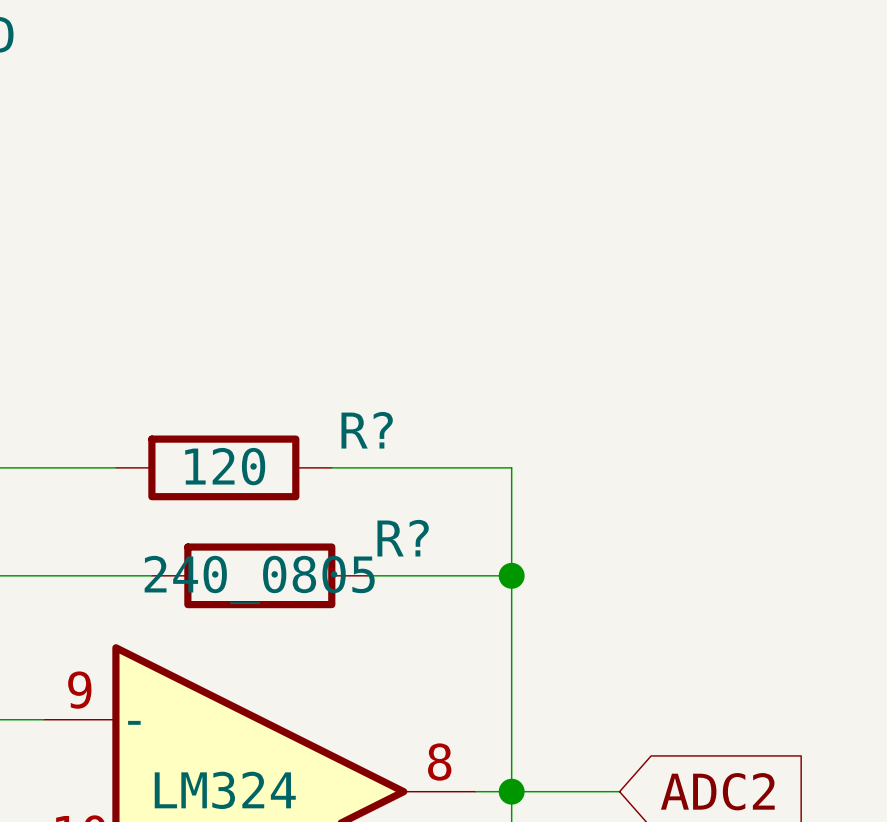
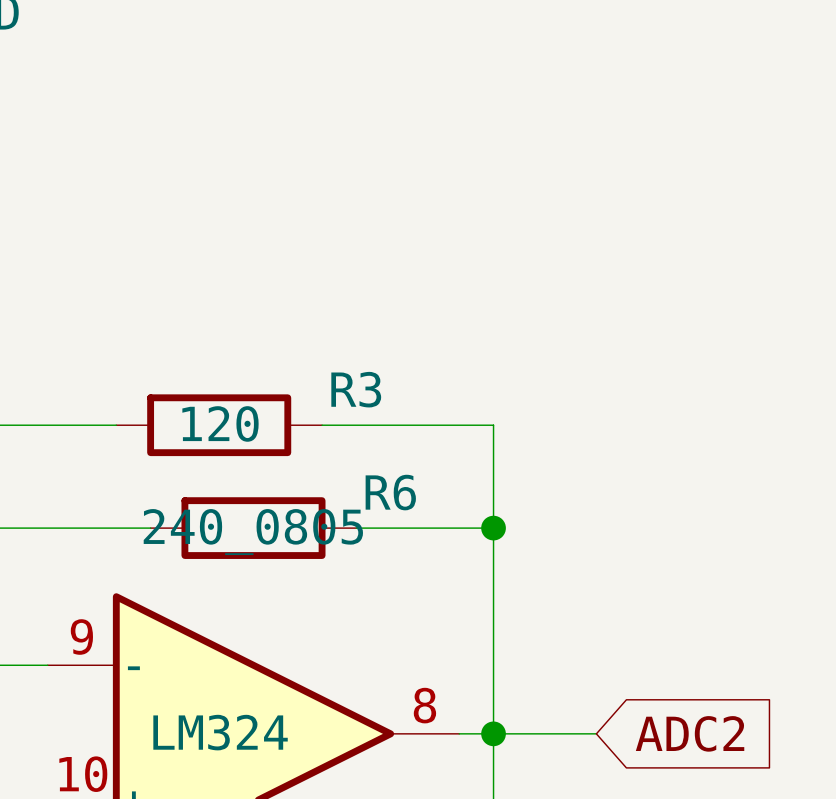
R? name: R? (367, 430) -> R3 (356, 389)
R? name: R? (403, 538) -> R6 (390, 492)

